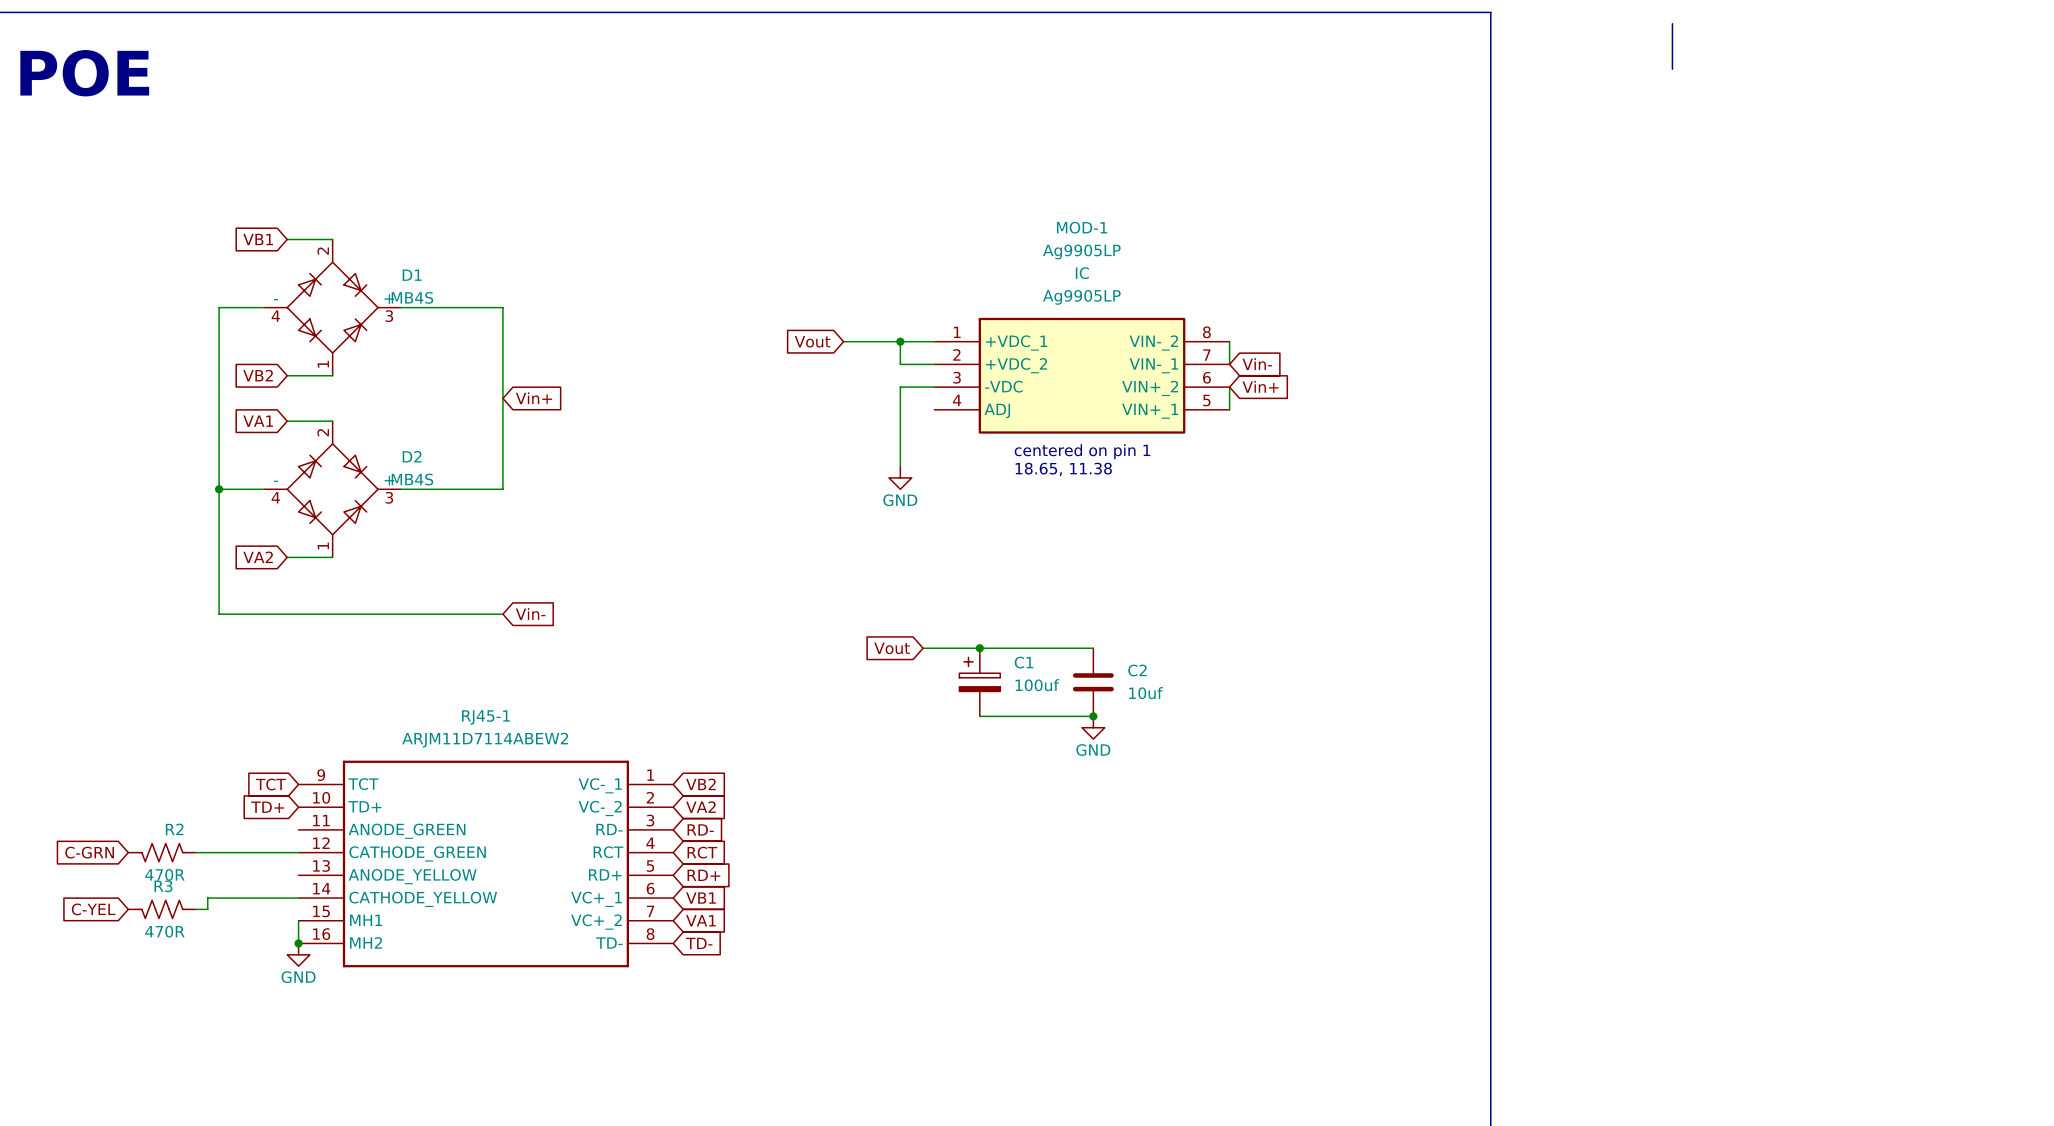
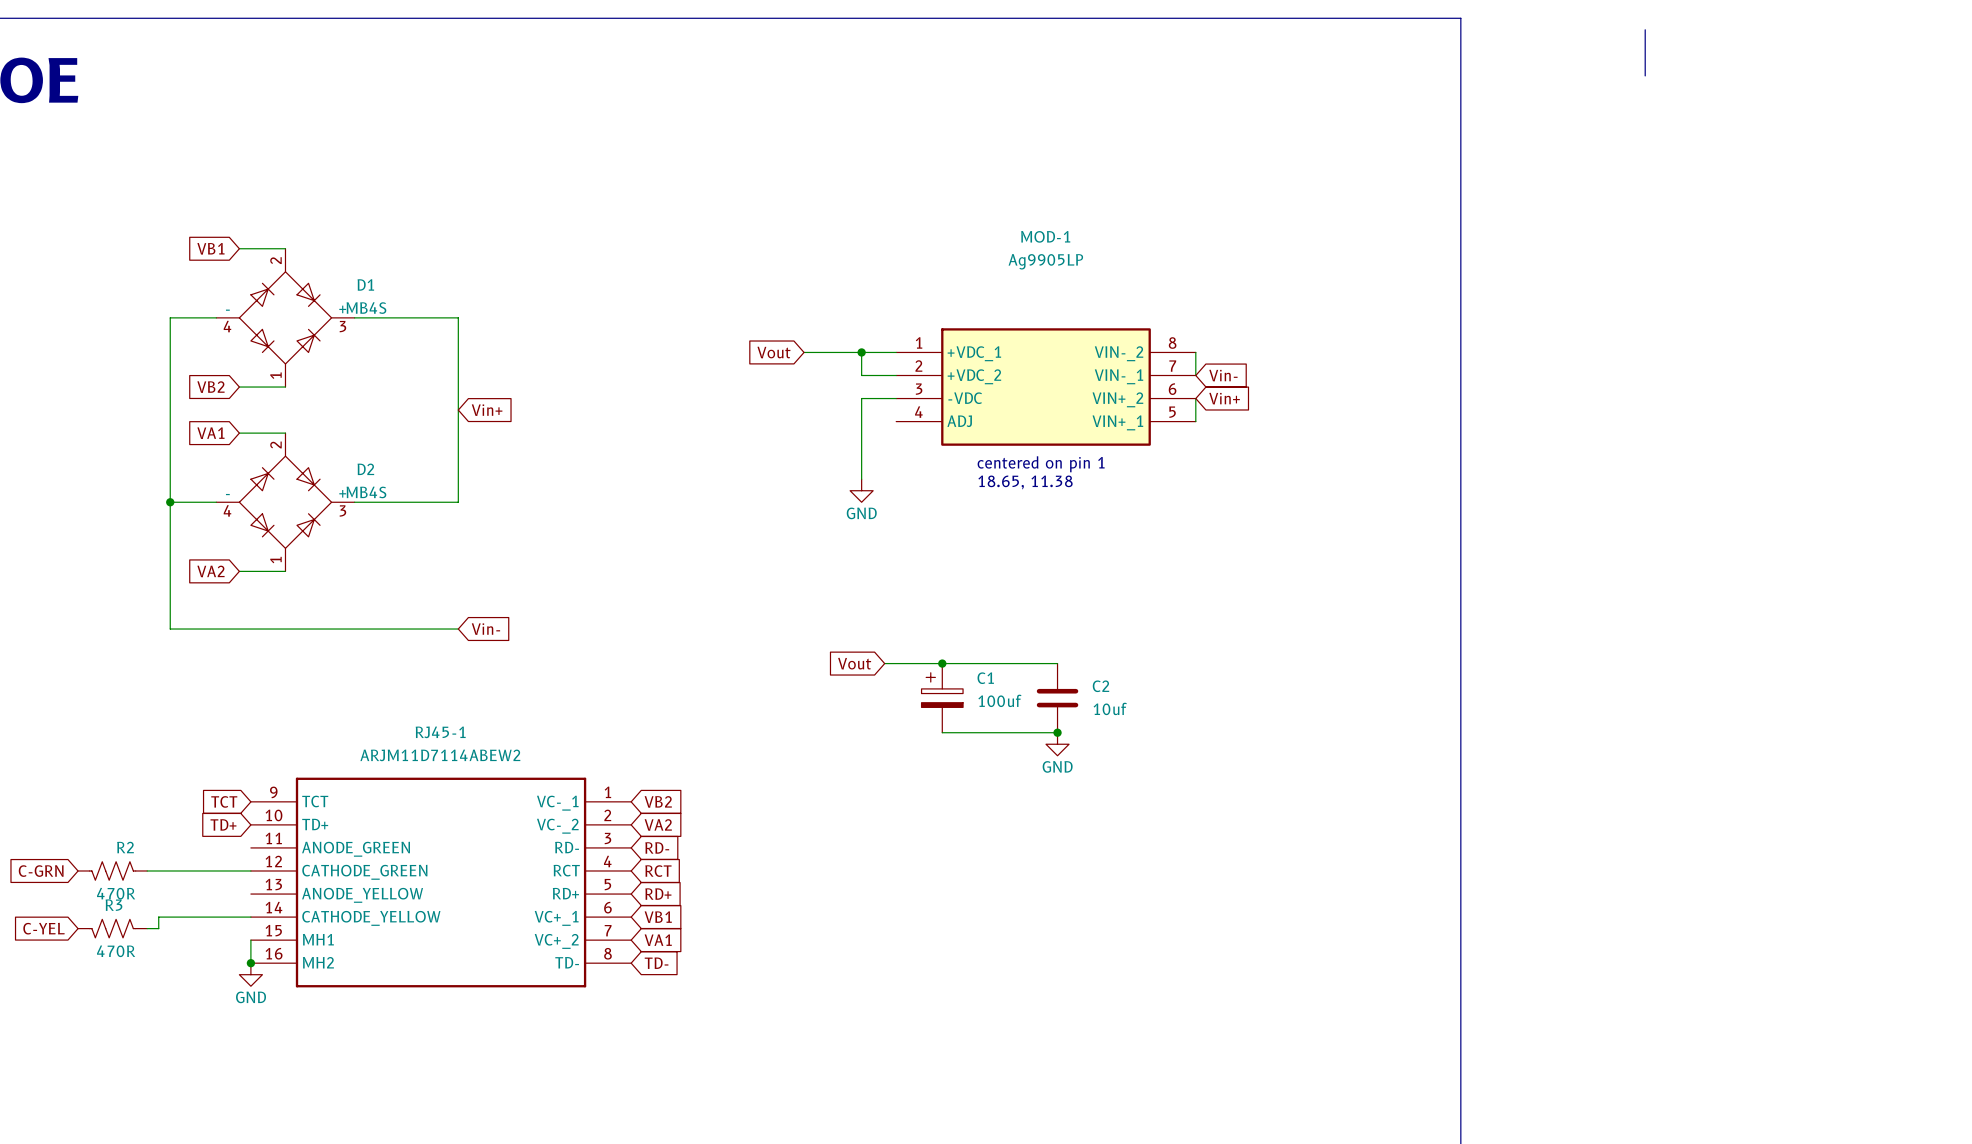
MOD-1 text: IC (1082, 273) -> none
MOD-1 text: Ag9905LP (1081, 297) -> none

